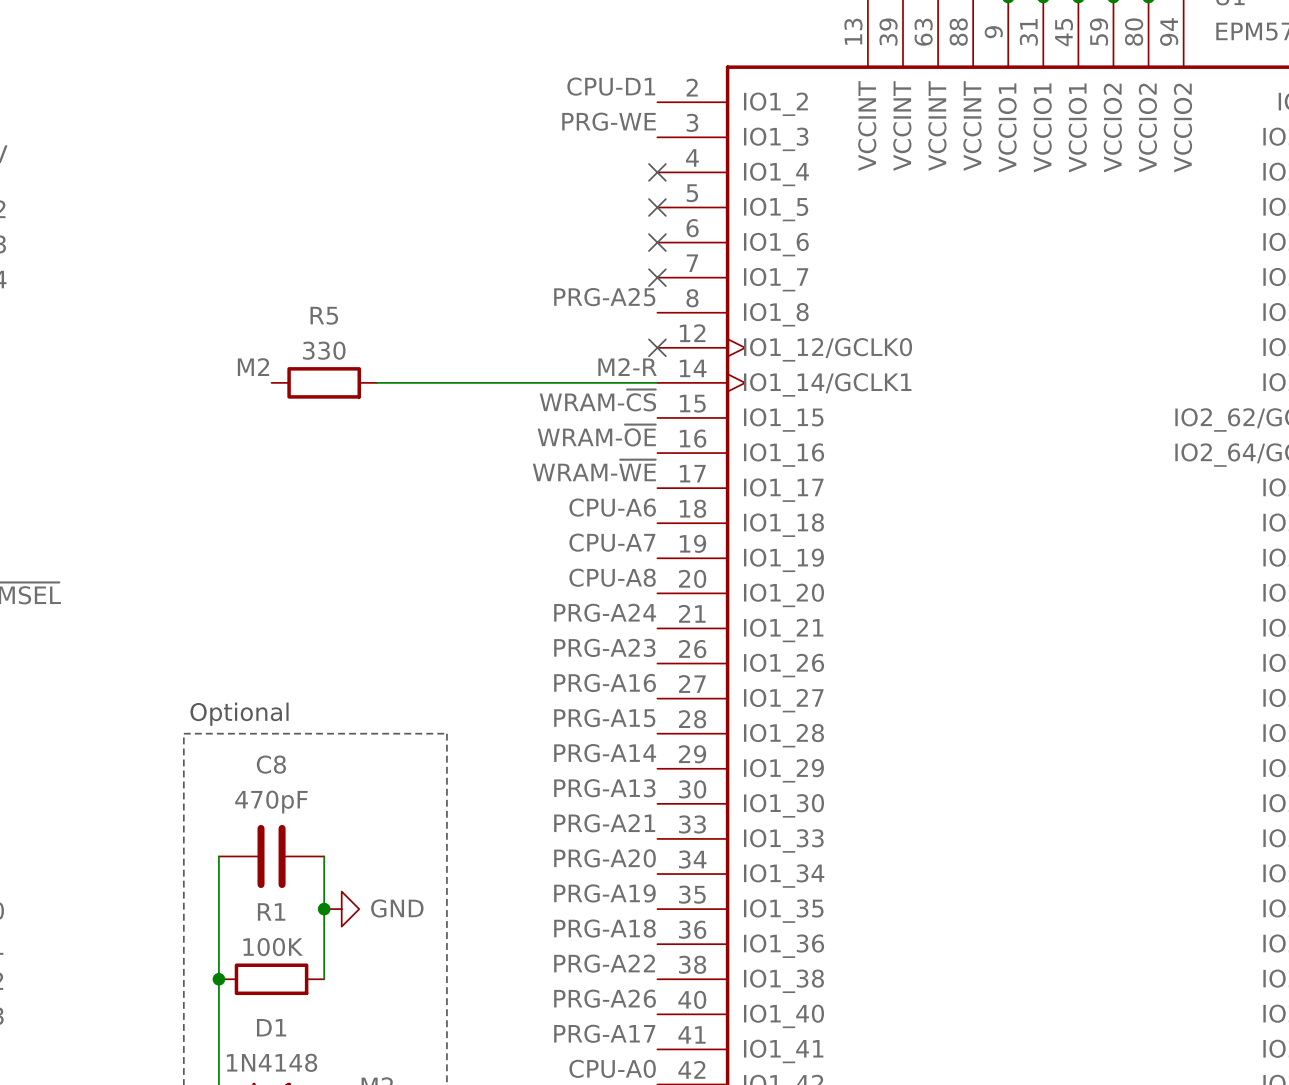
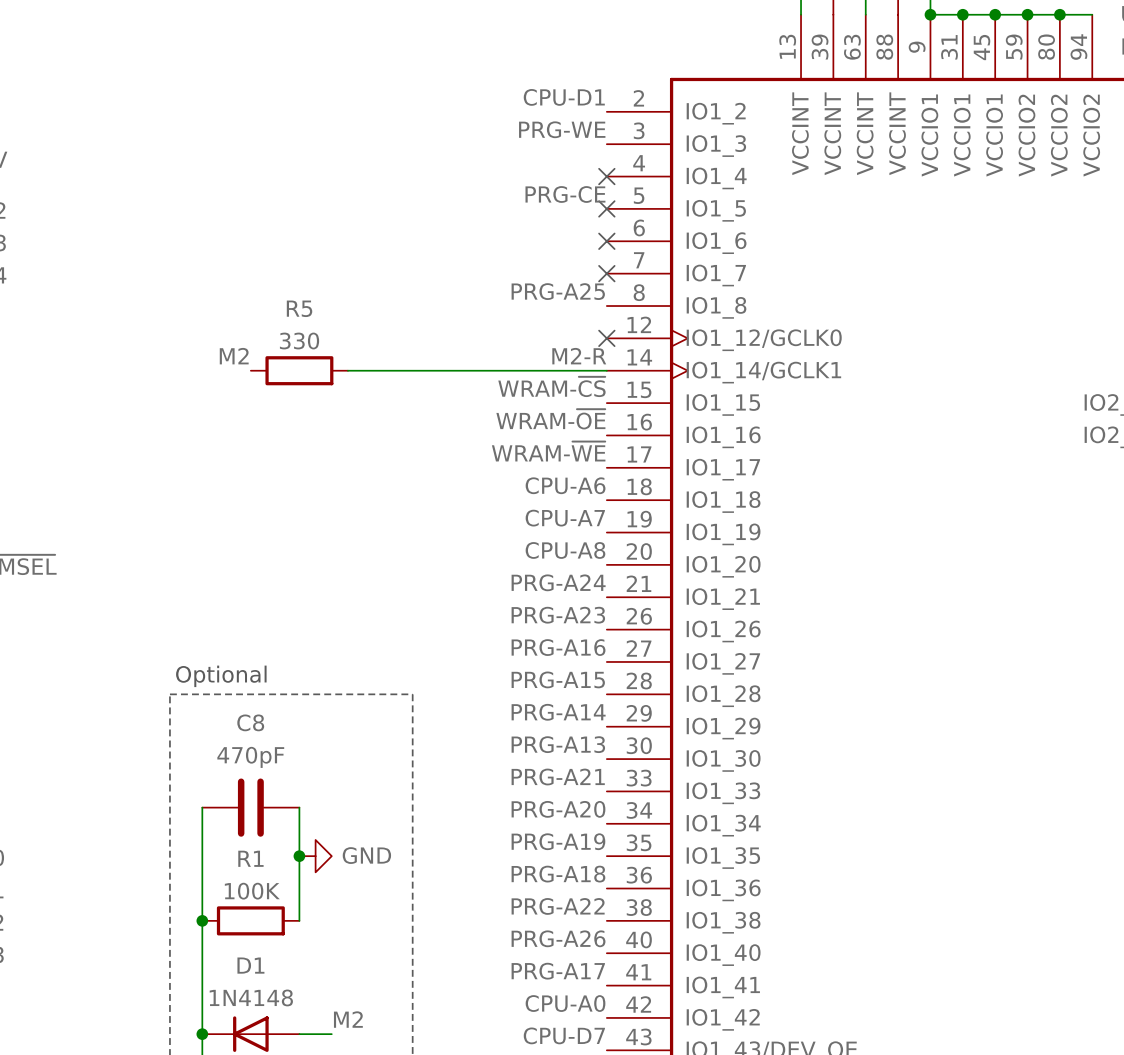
label: none -> PRG-CE (565, 194)

